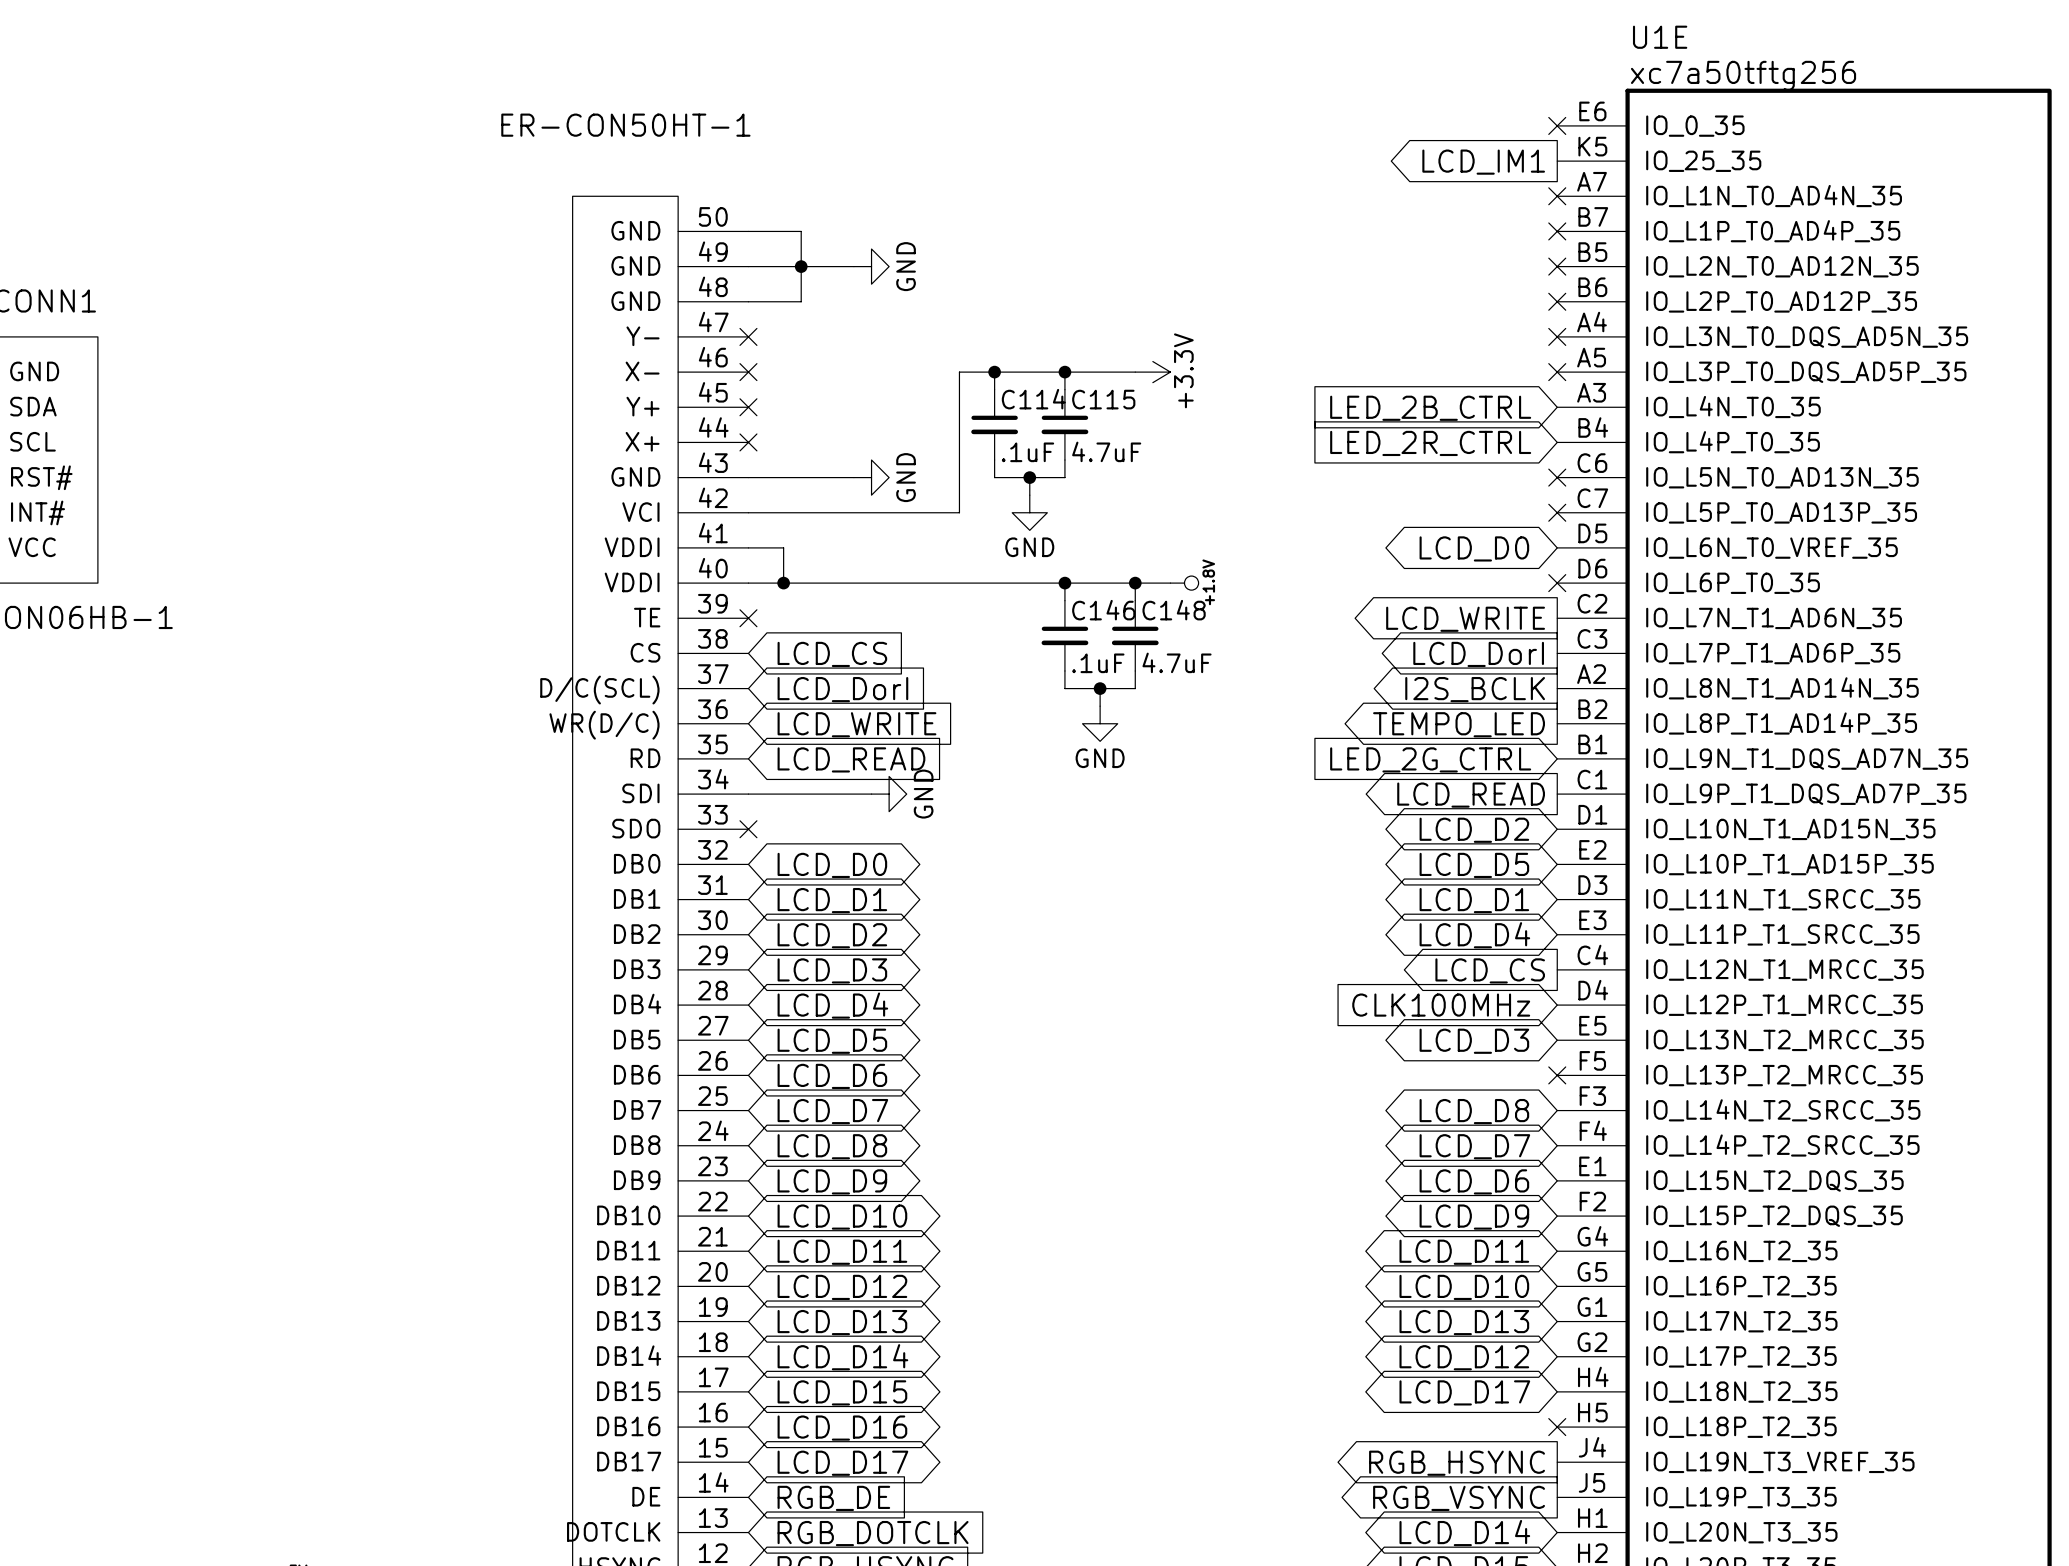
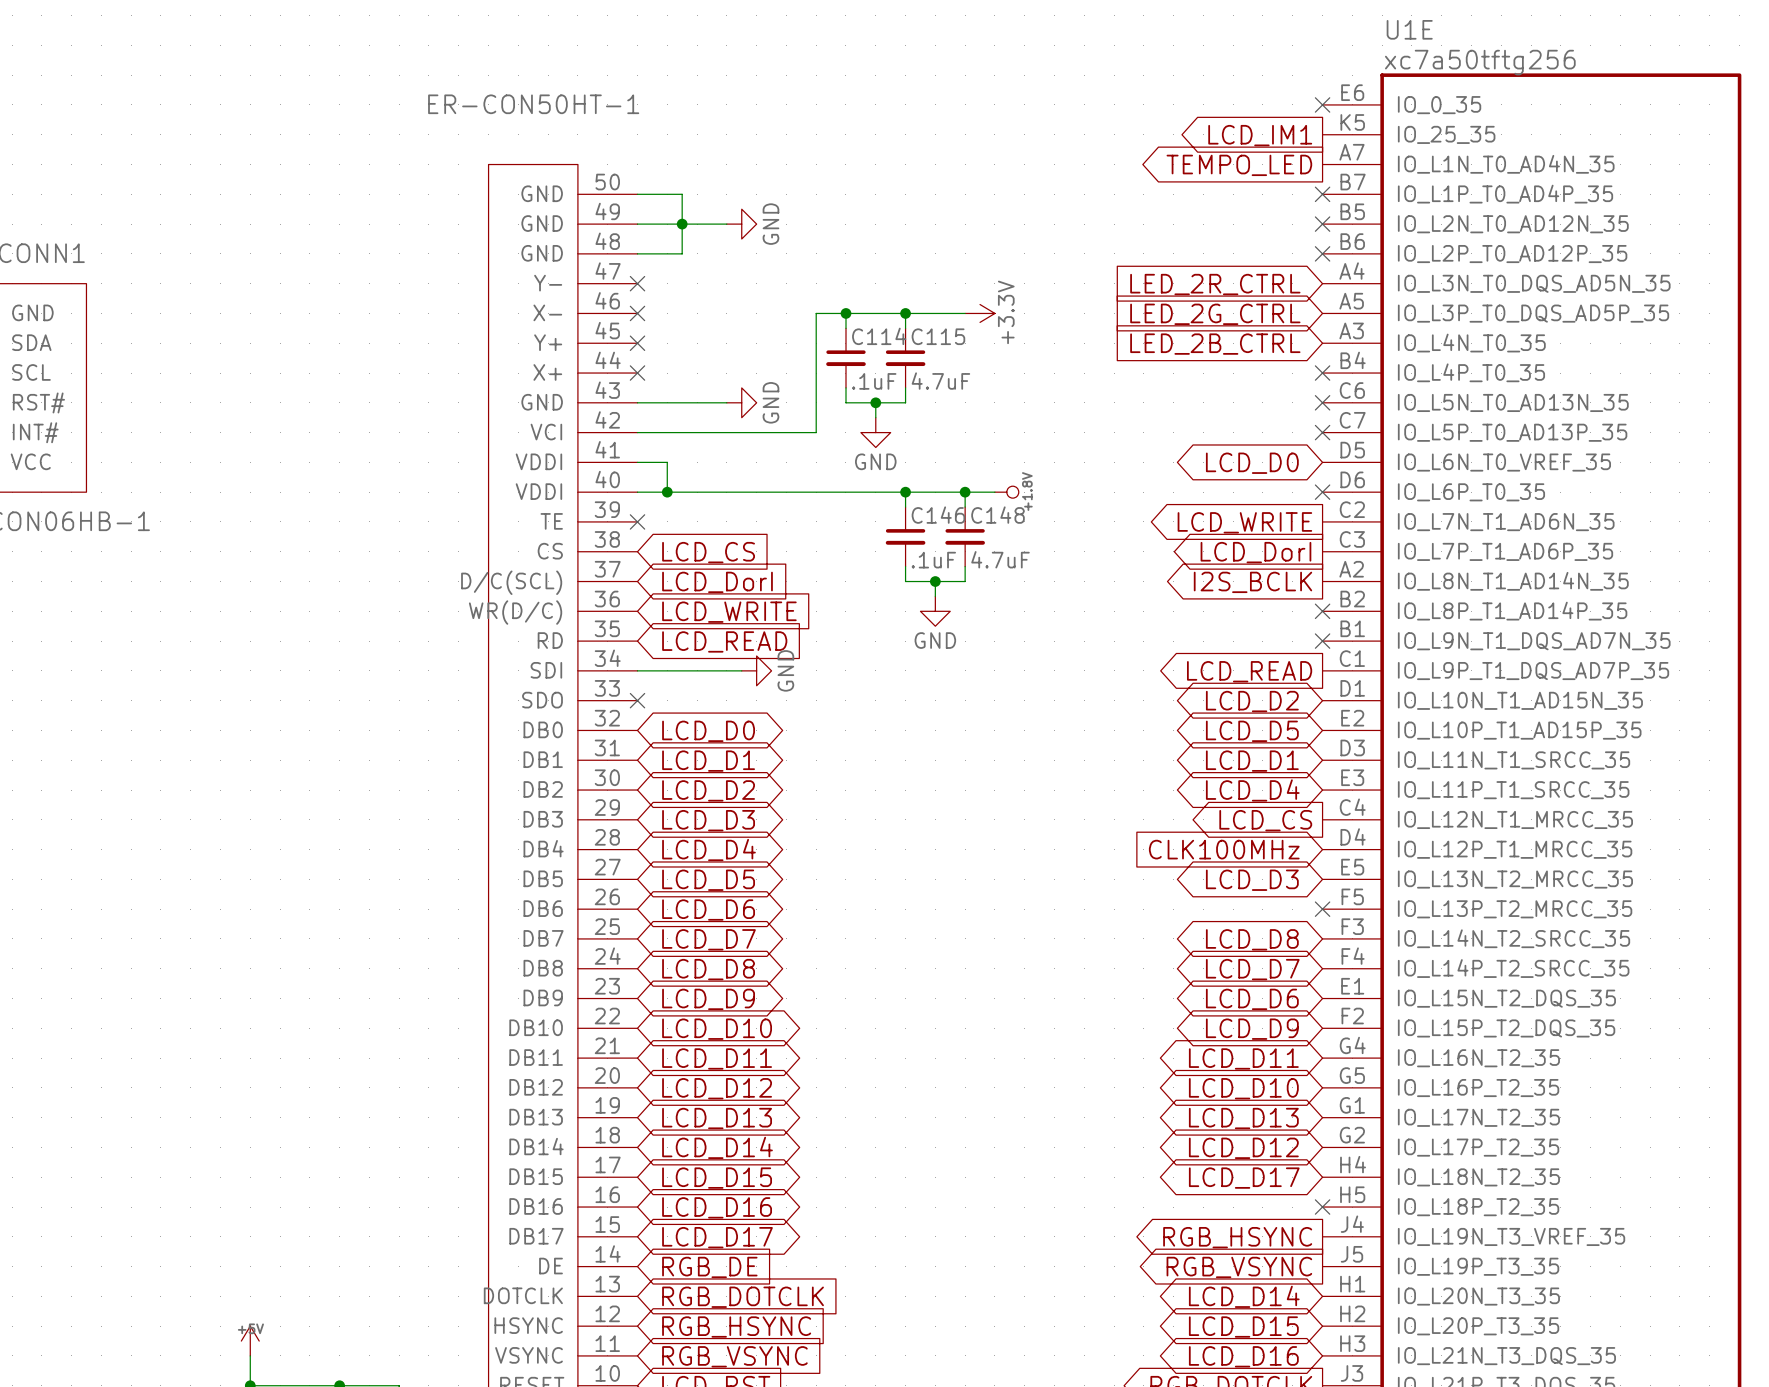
no-connect mark: (1557, 196) -> none
global label: none -> TEMPO_LED (1239, 165)
no-connect mark: (1557, 336) -> none
no-connect mark: (1557, 372) -> none
global label: none -> LED_2G_CTRL (1215, 314)
no-connect mark: none -> (1322, 373)
global label position: LED_2R_CTRL (1430, 443) -> LED_2R_CTRL (1215, 284)
no-connect mark: none -> (1322, 611)
global label: TEMPO_LED (1459, 724) -> none
no-connect mark: none -> (1322, 641)
global label: LED_2G_CTRL (1430, 759) -> none

